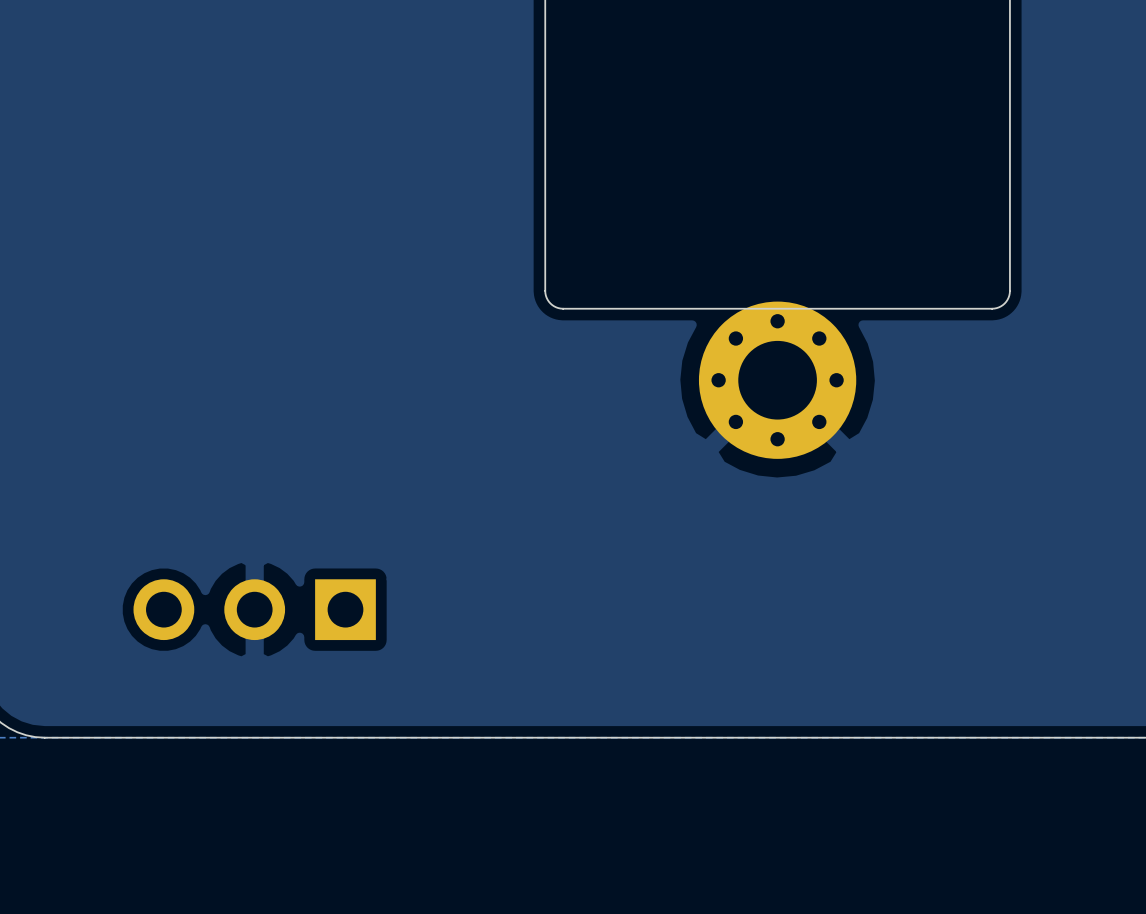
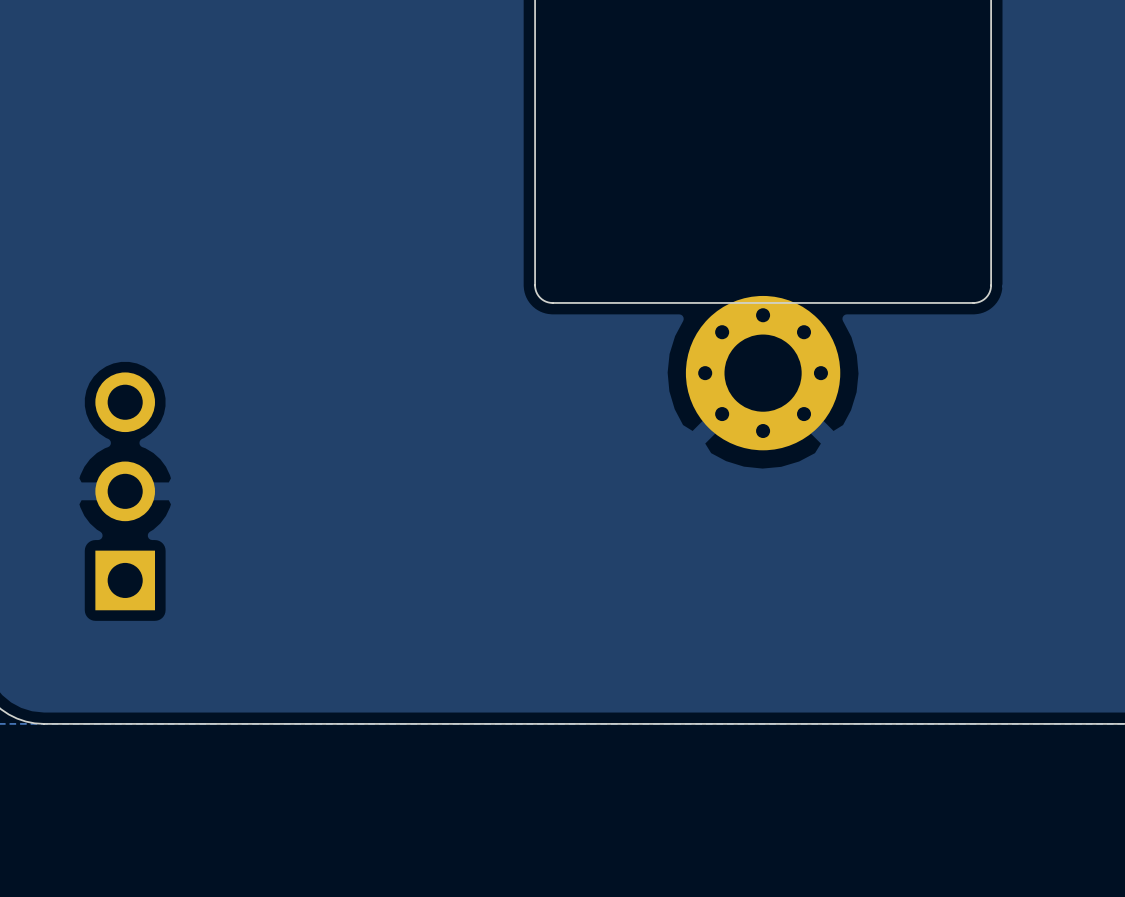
part rotation: 0° (254, 609) -> 90° clockwise (125, 491)
part position: (254, 609) -> (125, 491)

